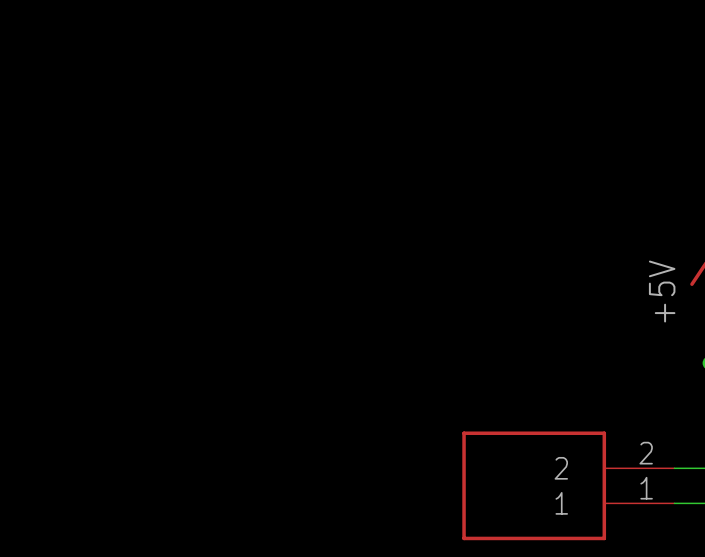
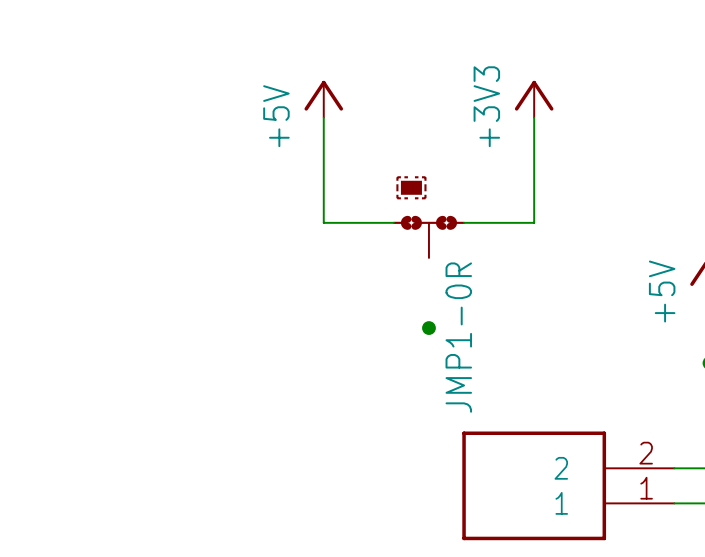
power symbol: none -> +5V (323, 99)
power symbol: none -> +3V3 (534, 99)
wire: none -> (323, 117) (323, 222) (393, 222)
wire: none -> (534, 117) (534, 222) (464, 222)
part: none -> (411, 187)
JMP1-0R: none -> (428, 236)
junction: none -> (428, 328)

